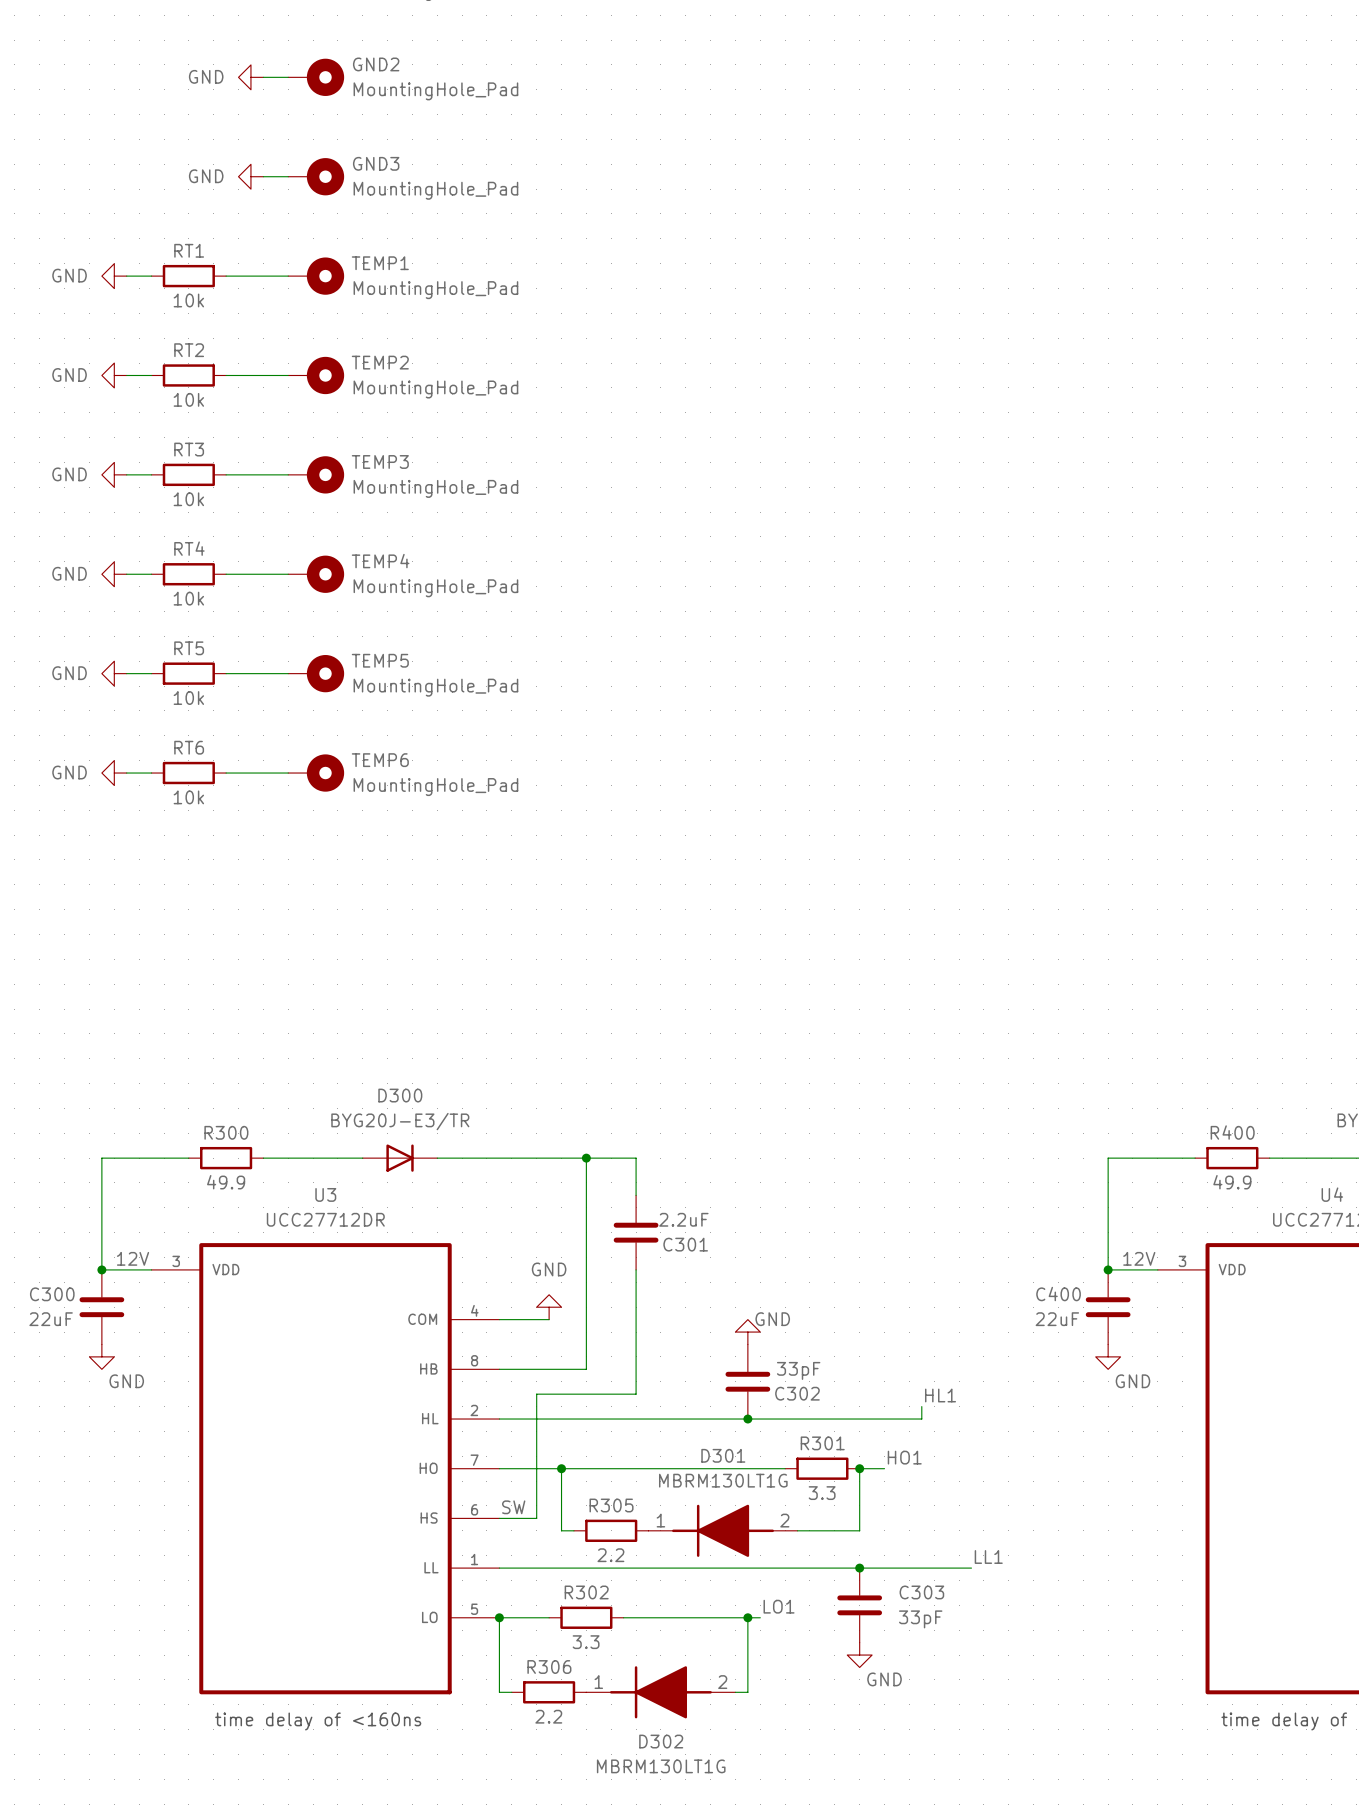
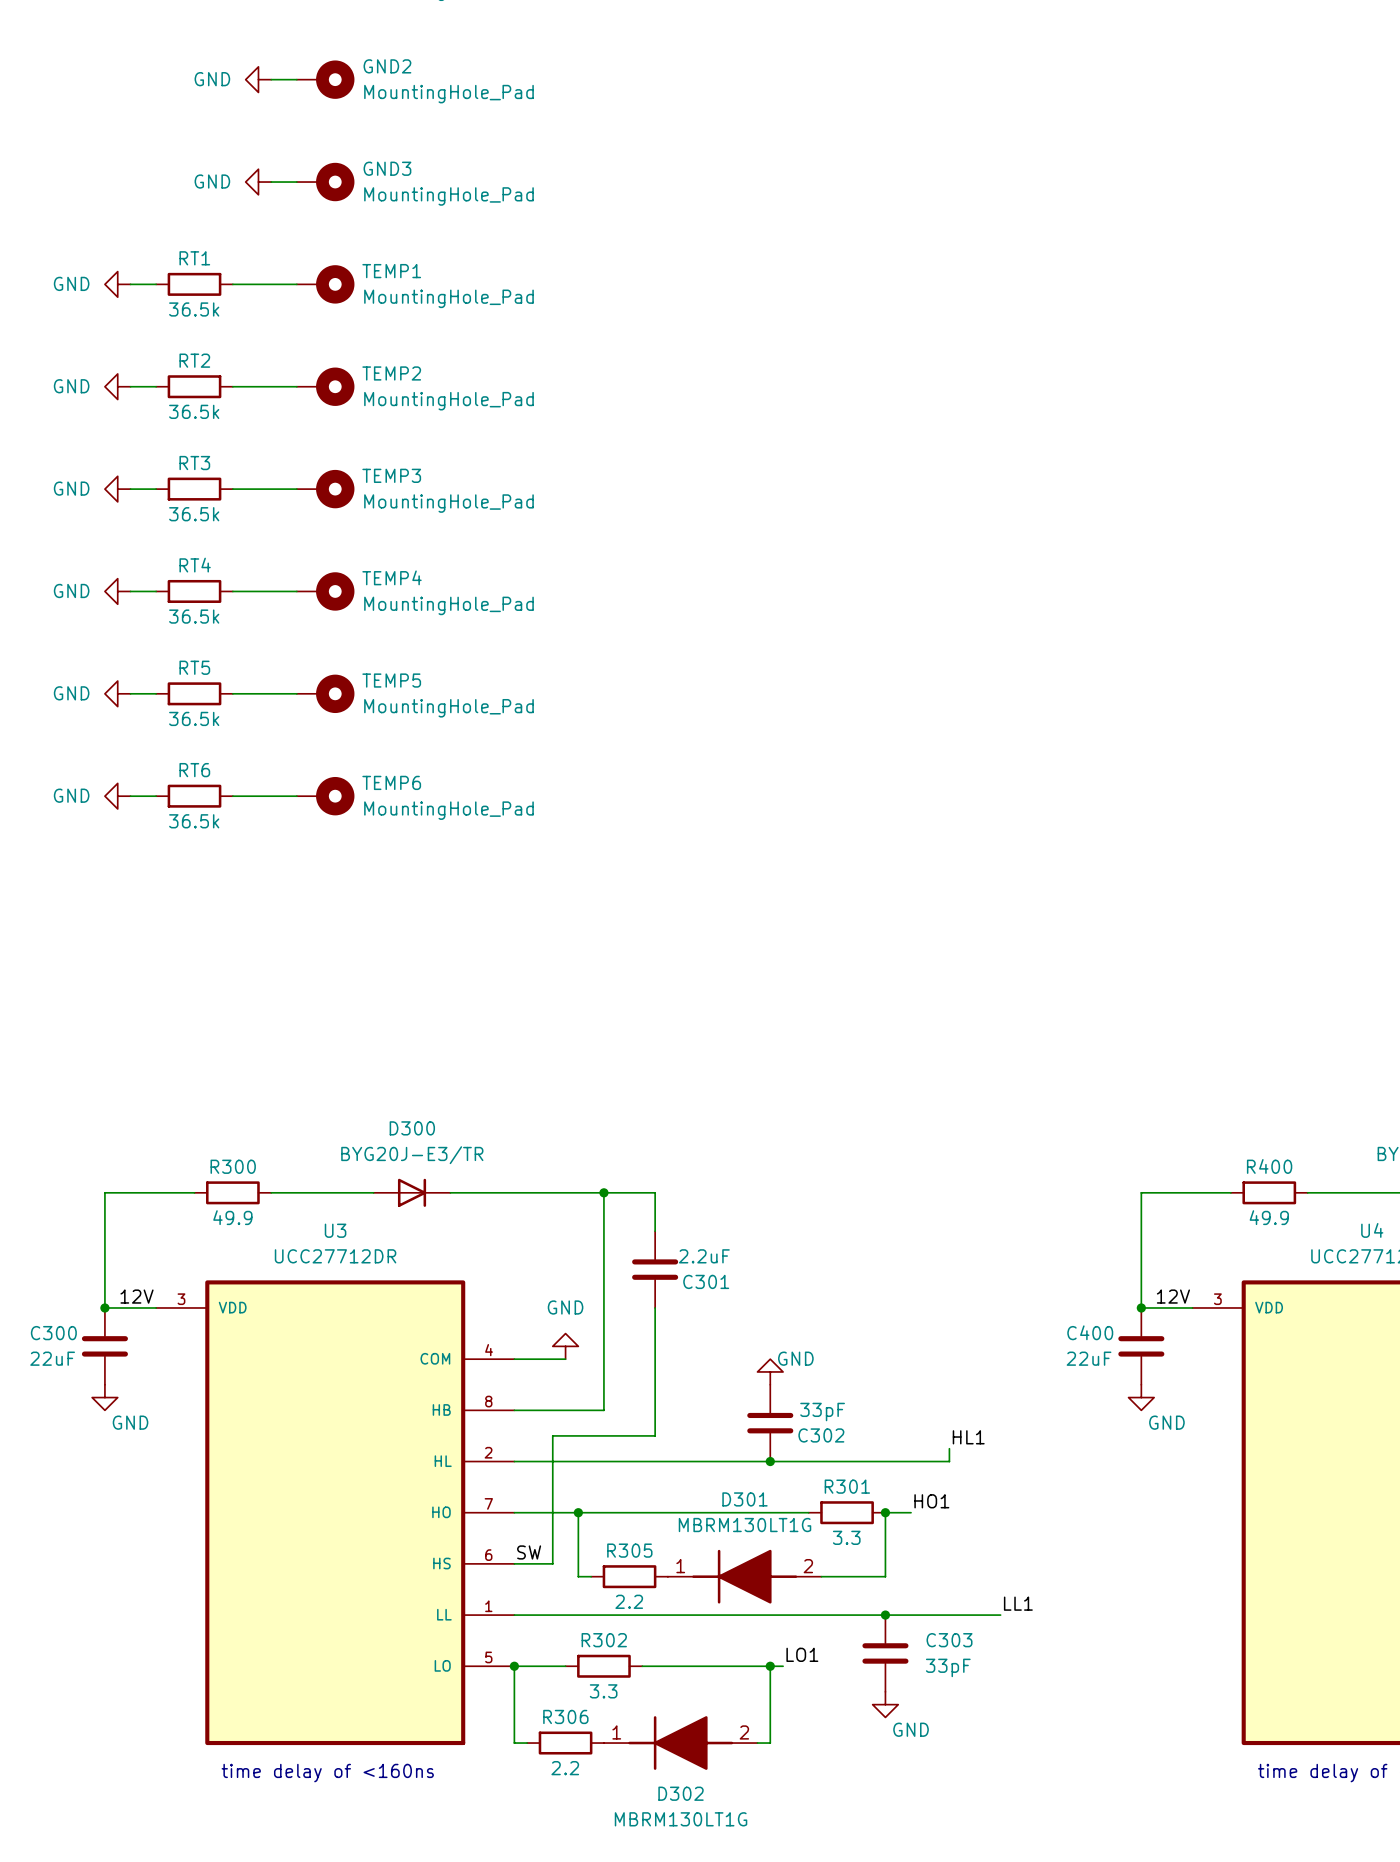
RT1 value: 10k (188, 300) -> 36.5k (194, 309)
RT2 value: 10k (188, 399) -> 36.5k (194, 411)
RT3 value: 10k (188, 499) -> 36.5k (194, 514)
RT4 value: 10k (188, 598) -> 36.5k (194, 616)
RT5 value: 10k (188, 698) -> 36.5k (194, 718)
RT6 value: 10k (188, 797) -> 36.5k (194, 821)

